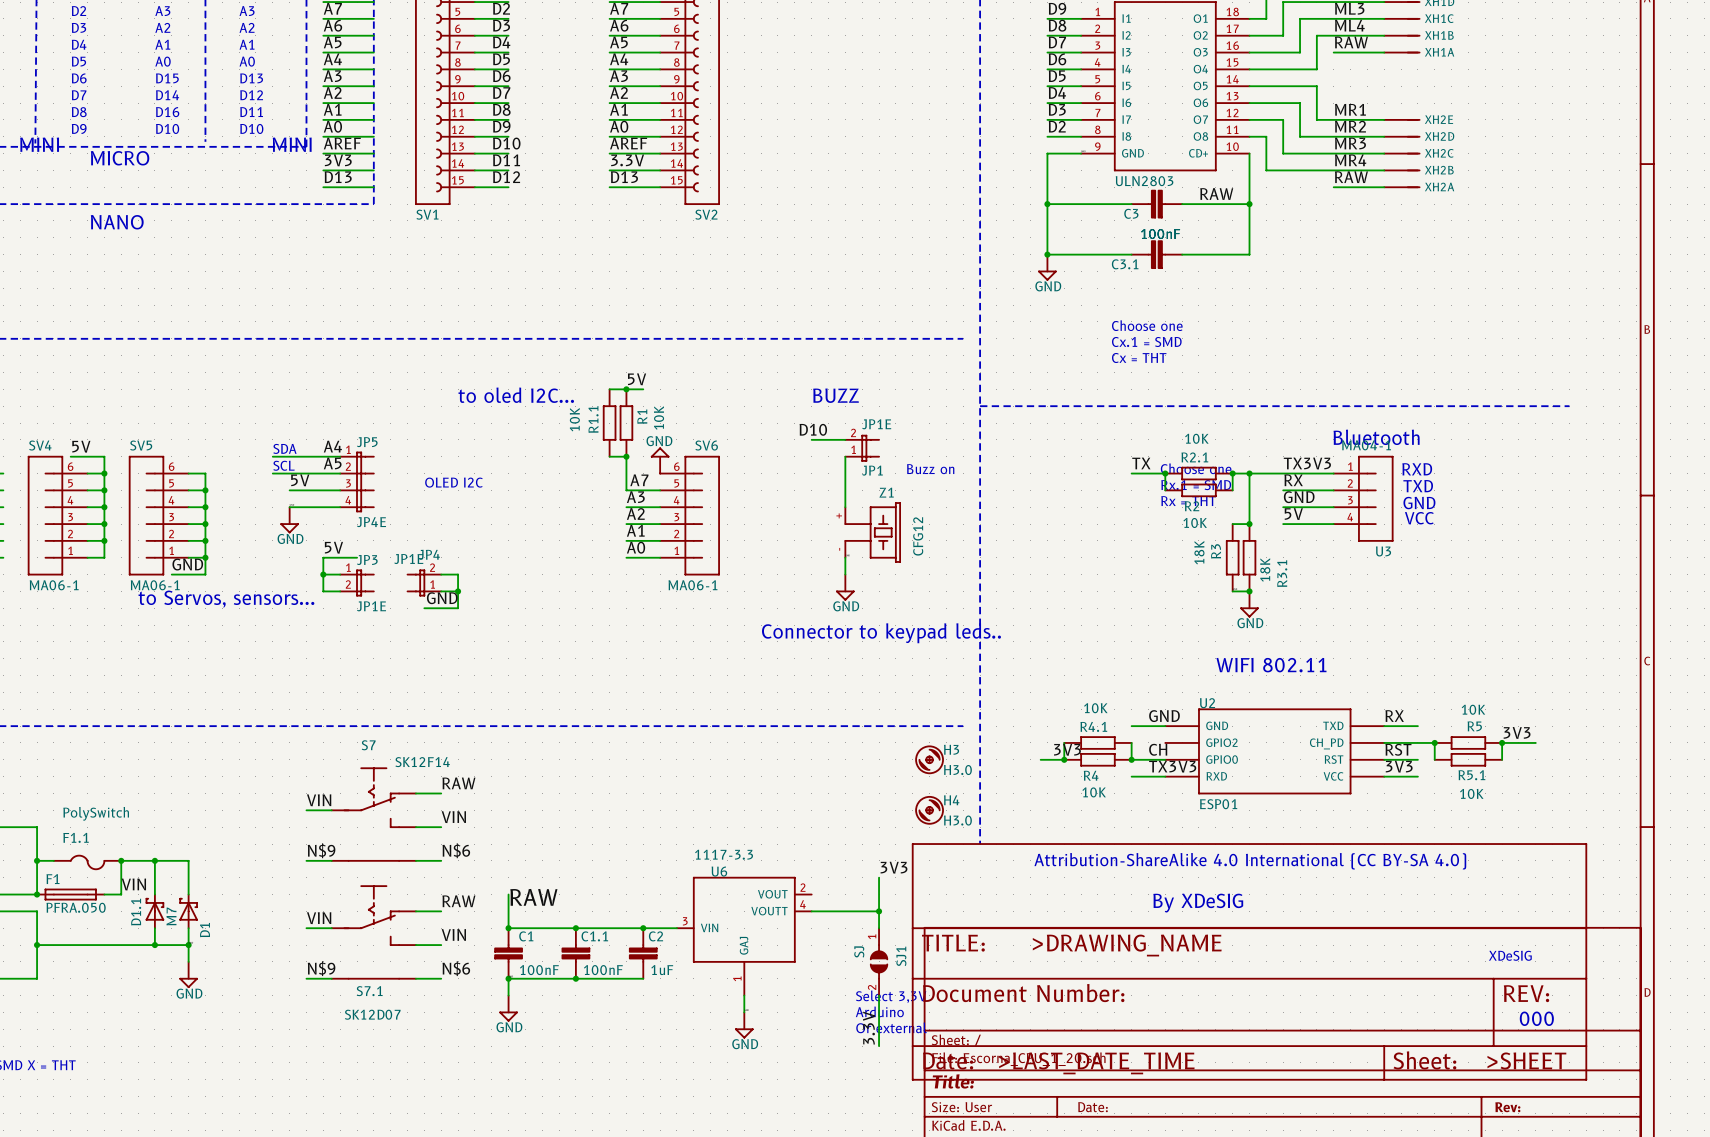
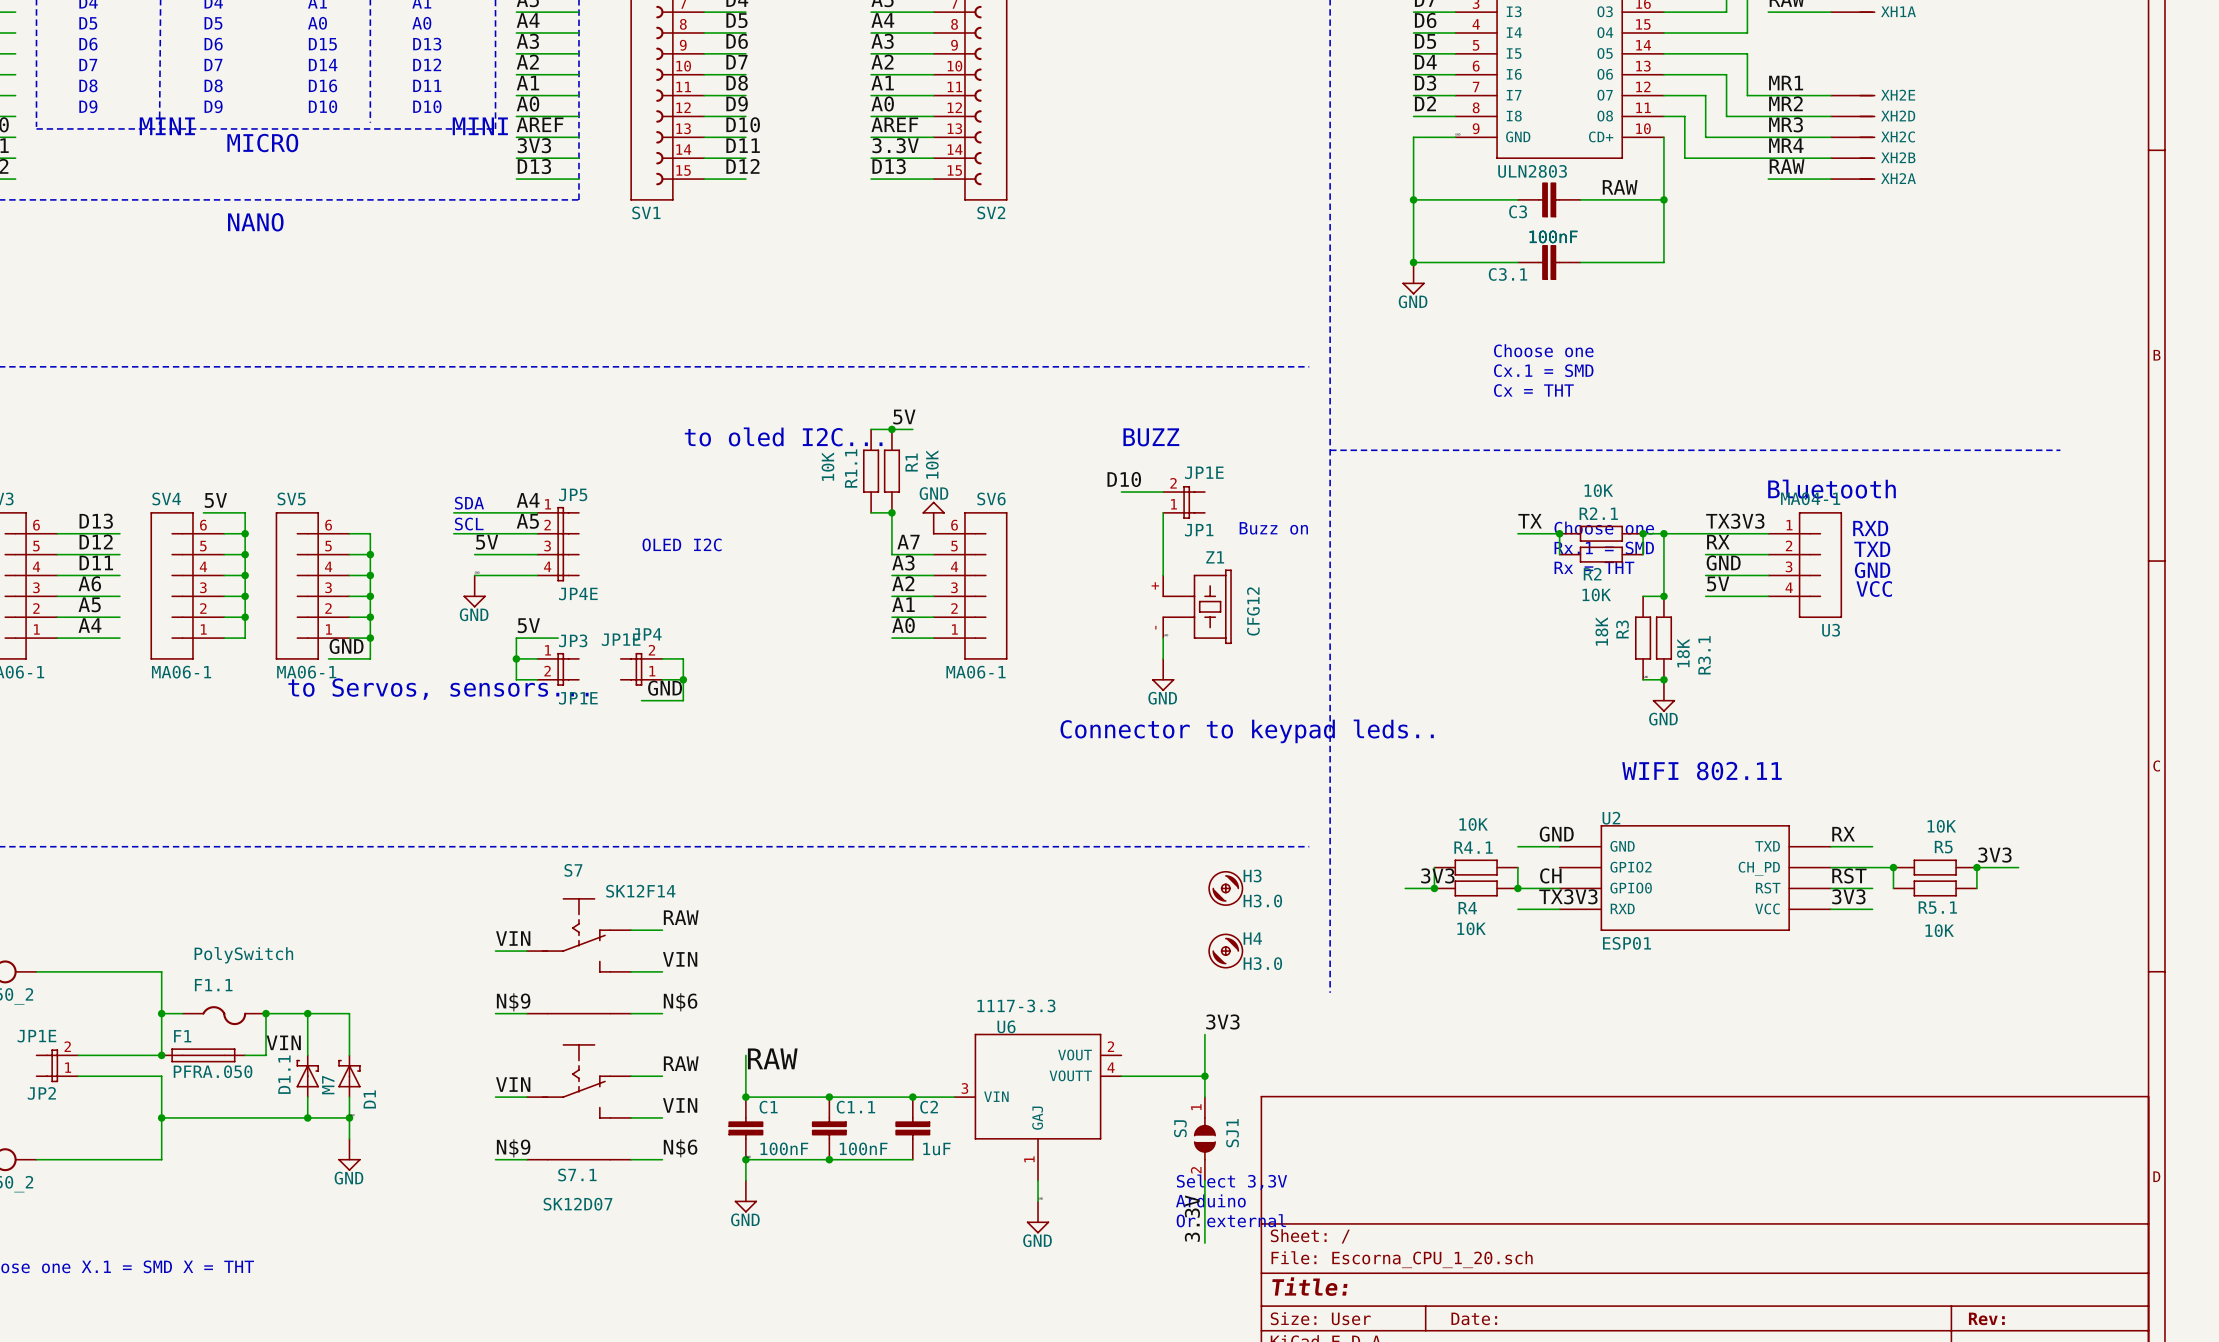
H3 position: (929, 759) -> (1225, 888)
H4 position: (929, 810) -> (1225, 951)
text: Attribution-ShareAlike 4.0 International (CC BY-SA 4.0) (1250, 861) -> none
text: By XDeSIG (1198, 903) -> none
text: XDeSIG (1510, 955) -> none
power symbol: (1249, 961) -> none
text: 000 (1536, 1018) -> none

